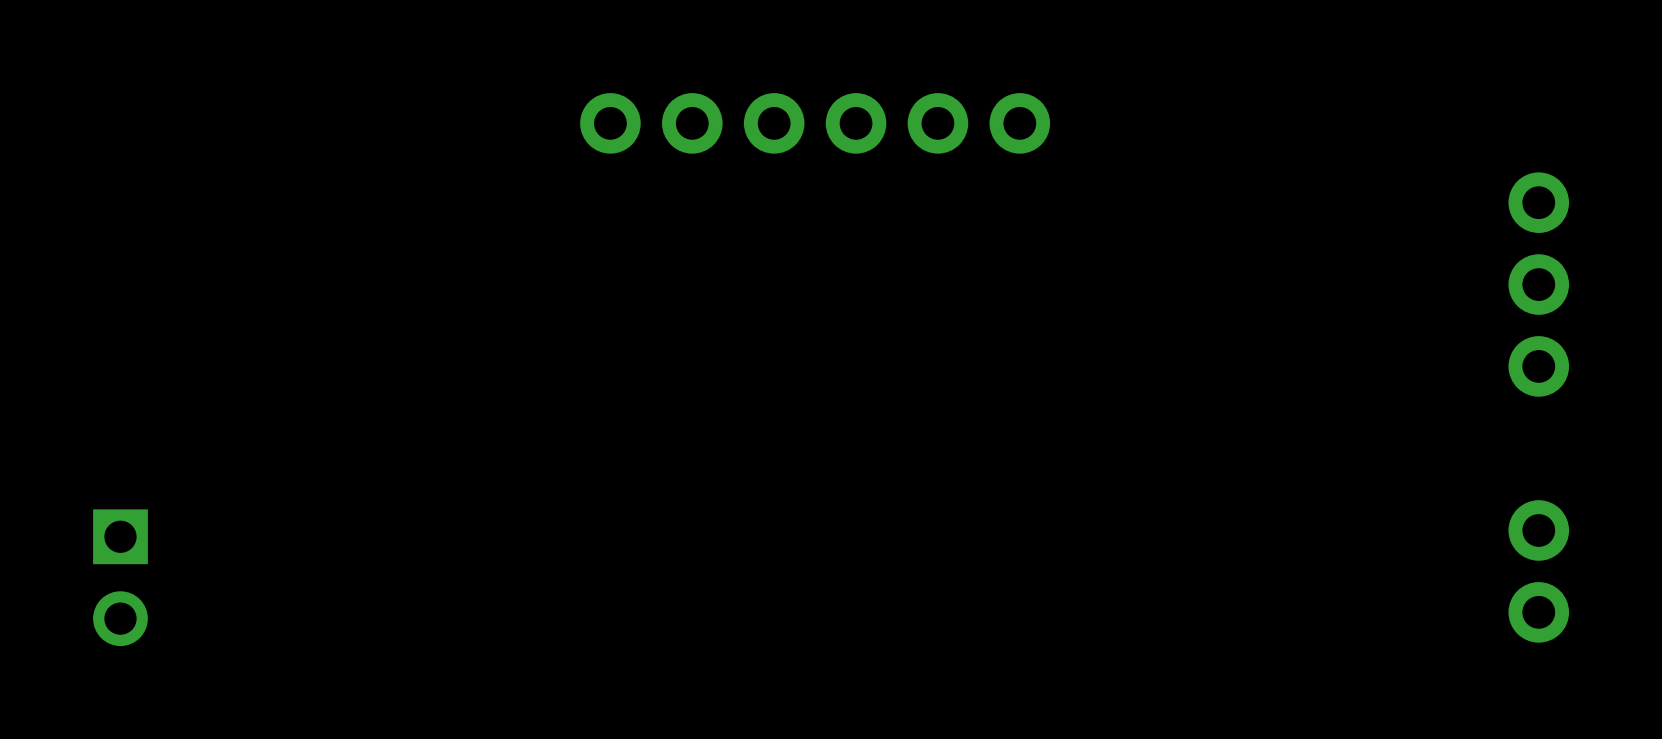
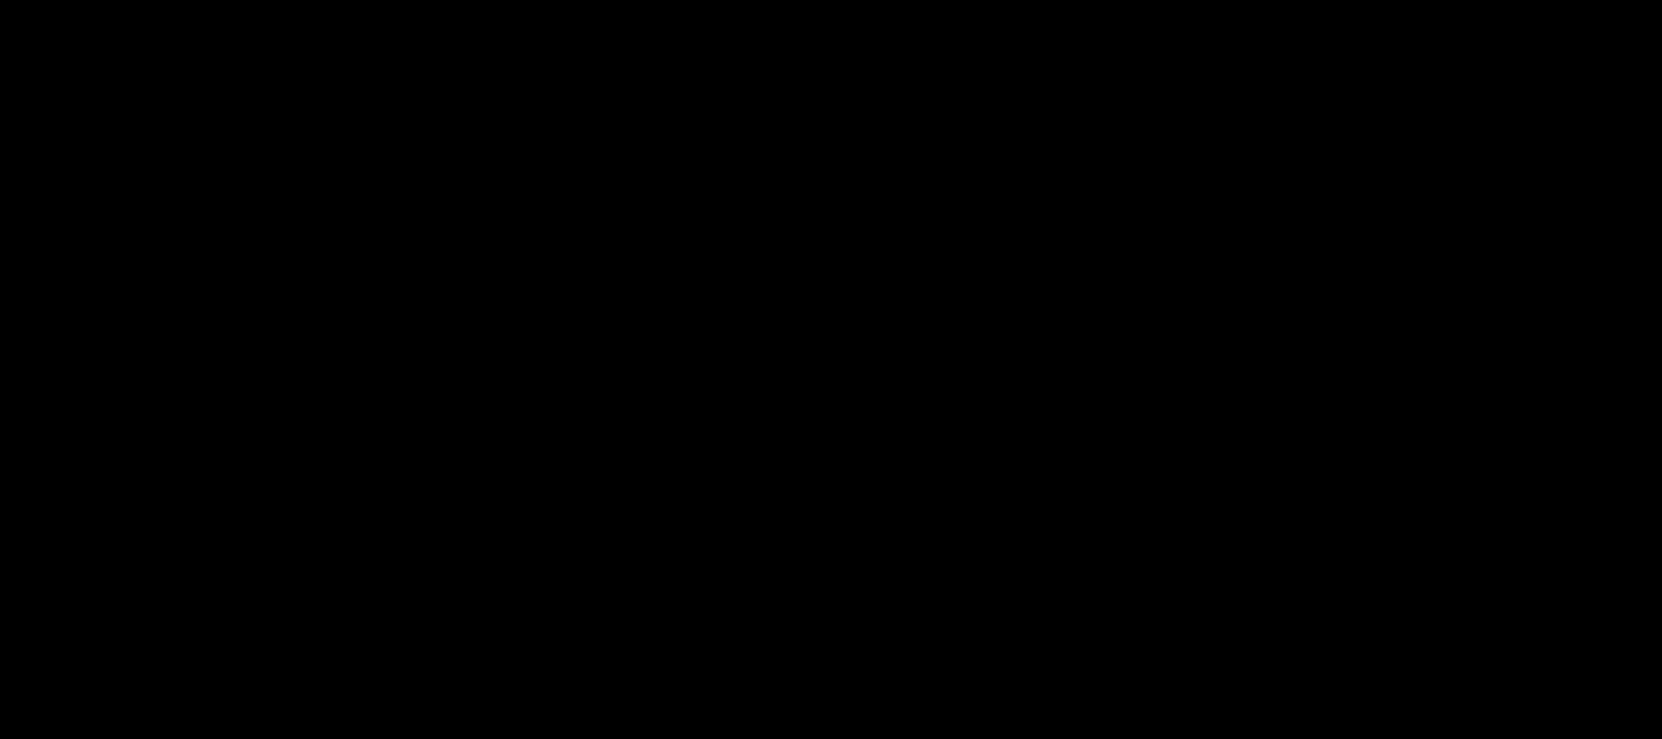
part: (815, 123) -> none
part: (1538, 284) -> none
part: (1538, 571) -> none
part: (120, 577) -> none

